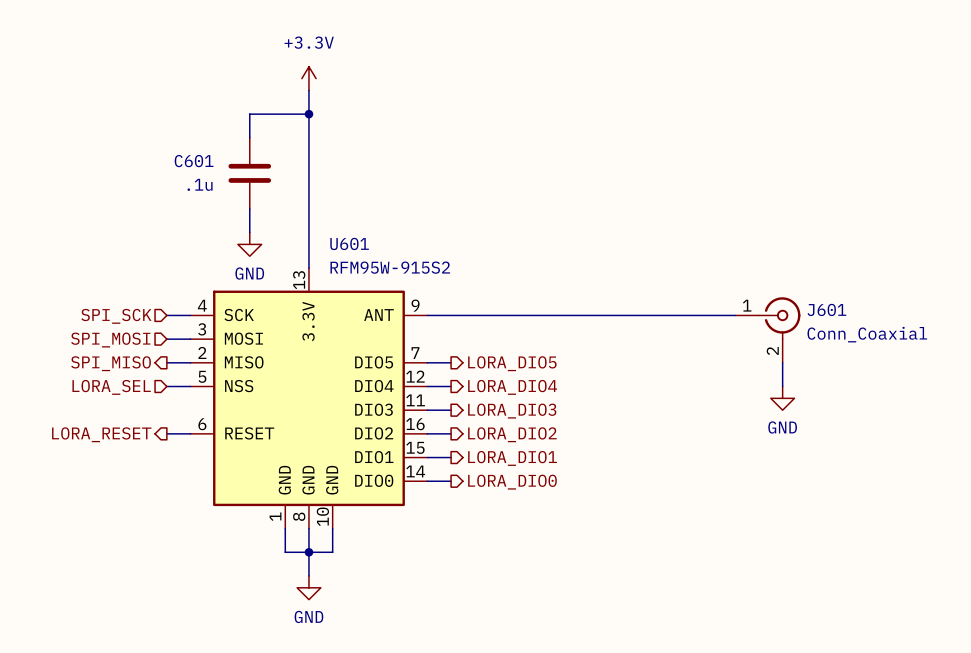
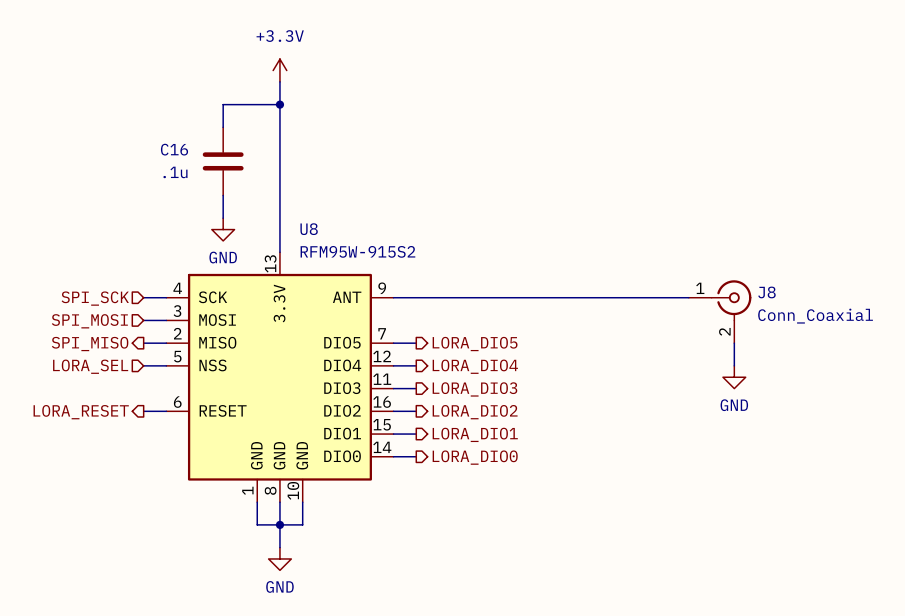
C601 name: C601 (194, 161) -> C16 (174, 149)
U601 name: U601 (349, 243) -> U8 (309, 229)
J601 name: J601 (826, 309) -> J8 (766, 292)

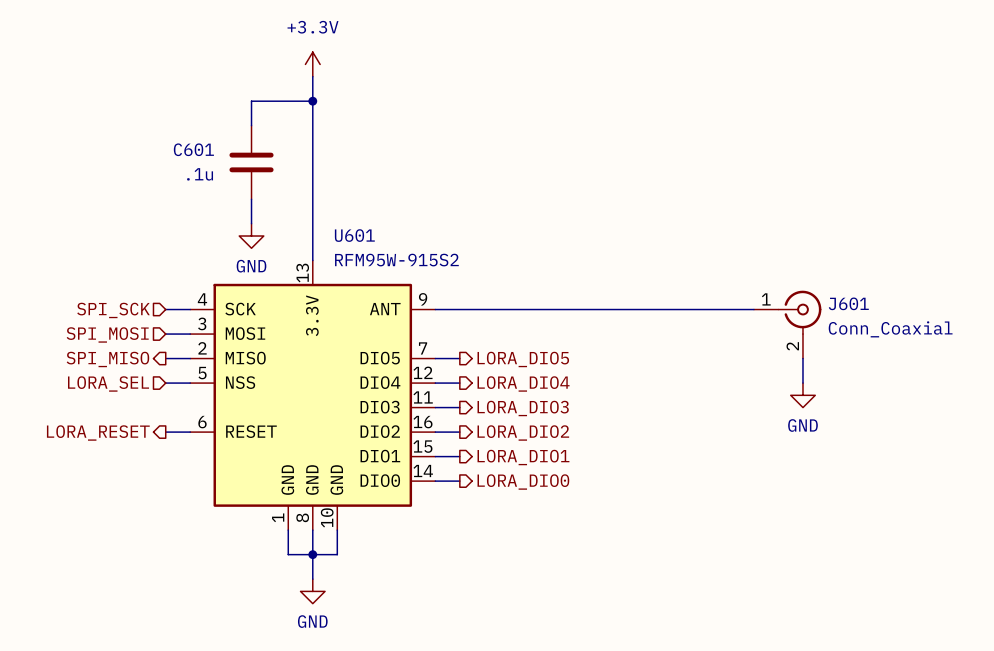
C16 name: C16 (174, 149) -> C601 (193, 149)
U8 name: U8 (309, 229) -> U601 (354, 235)
J8 name: J8 (766, 292) -> J601 (848, 303)

